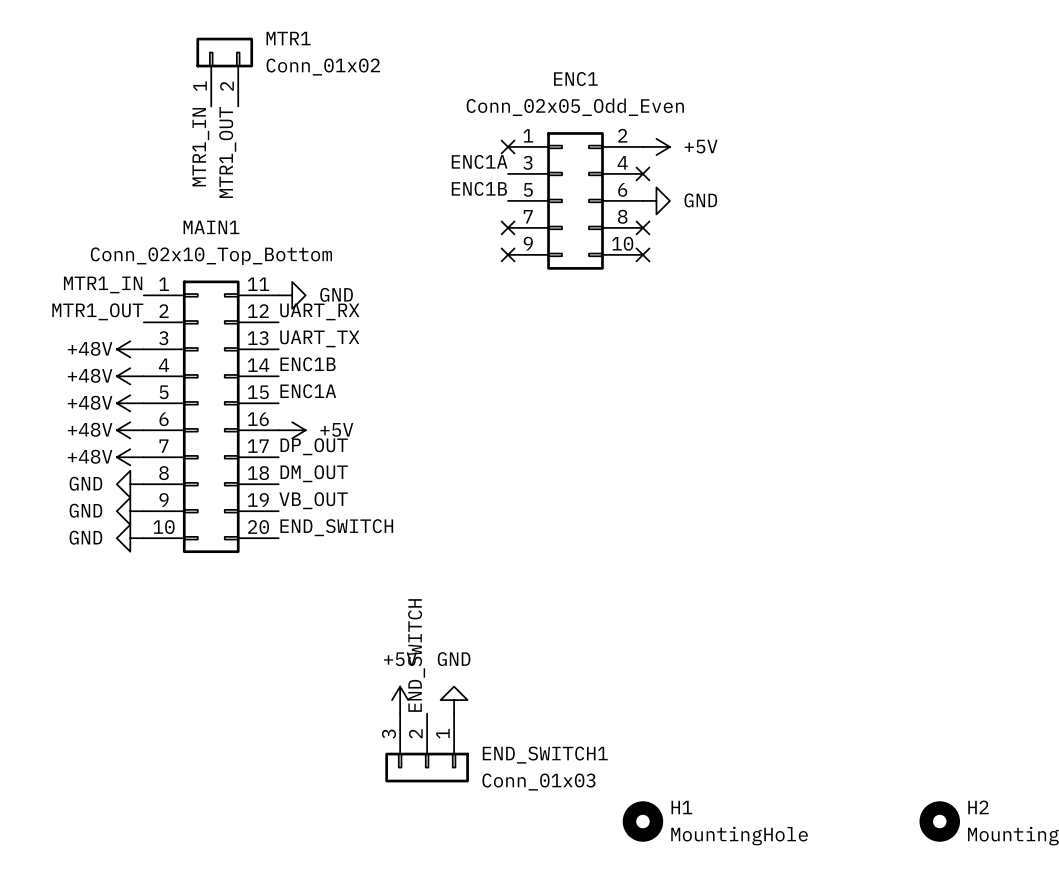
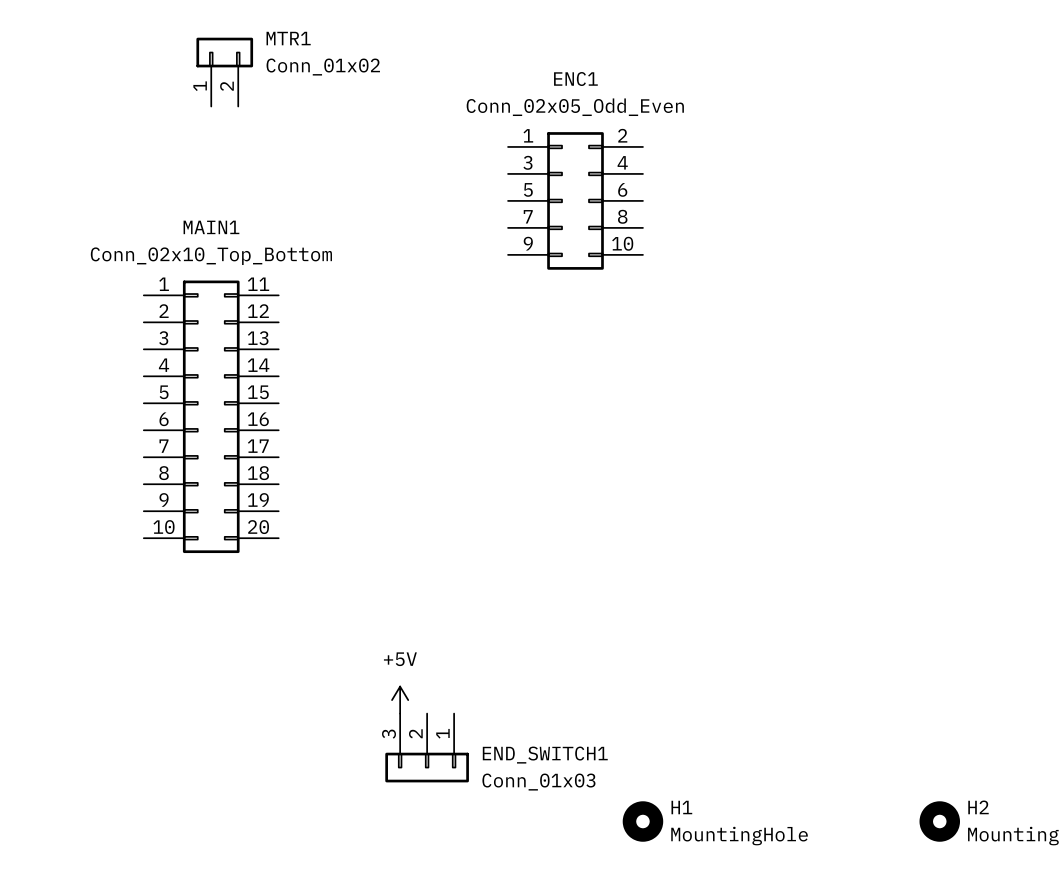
no-connect mark: (508, 146) -> none
power symbol: +5V (656, 146) -> none
label: MTR1_IN (200, 147) -> none
label: MTR1_OUT (227, 152) -> none
label: ENC1A (479, 161) -> none
no-connect mark: (642, 173) -> none
label: ENC1B (479, 188) -> none
power symbol: GND (656, 200) -> none
no-connect mark: (508, 227) -> none
no-connect mark: (642, 227) -> none
no-connect mark: (508, 254) -> none
no-connect mark: (642, 254) -> none
label: MTR1_IN (103, 284) -> none
power symbol: GND (292, 295) -> none
label: MTR1_OUT (97, 311) -> none
label: UART_RX (319, 311) -> none
label: UART_TX (319, 338) -> none
power symbol: +48V (130, 349) -> none
label: ENC1B (308, 364) -> none
power symbol: +48V (130, 376) -> none
label: ENC1A (308, 391) -> none
power symbol: +48V (130, 403) -> none
power symbol: +48V (130, 430) -> none
power symbol: +5V (292, 430) -> none
label: DP_OUT (314, 446) -> none
power symbol: +48V (130, 457) -> none
label: DM_OUT (314, 473) -> none
power symbol: GND (130, 484) -> none
label: VB_OUT (313, 500) -> none
power symbol: GND (130, 511) -> none
label: END_SWITCH (336, 527) -> none
power symbol: GND (130, 538) -> none
label: END_SWITCH (416, 655) -> none
power symbol: GND (454, 700) -> none

